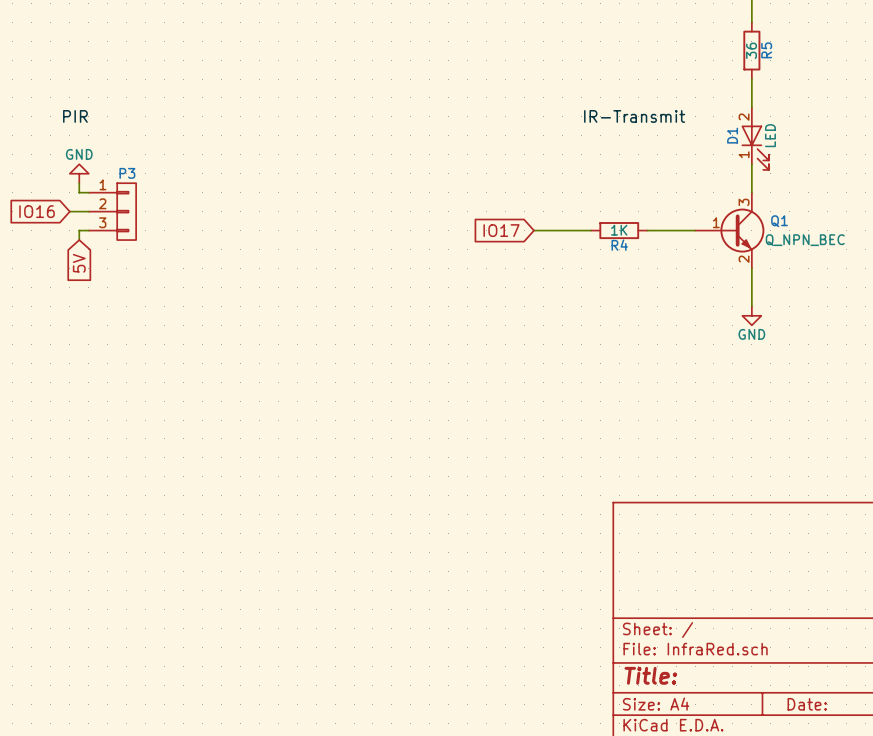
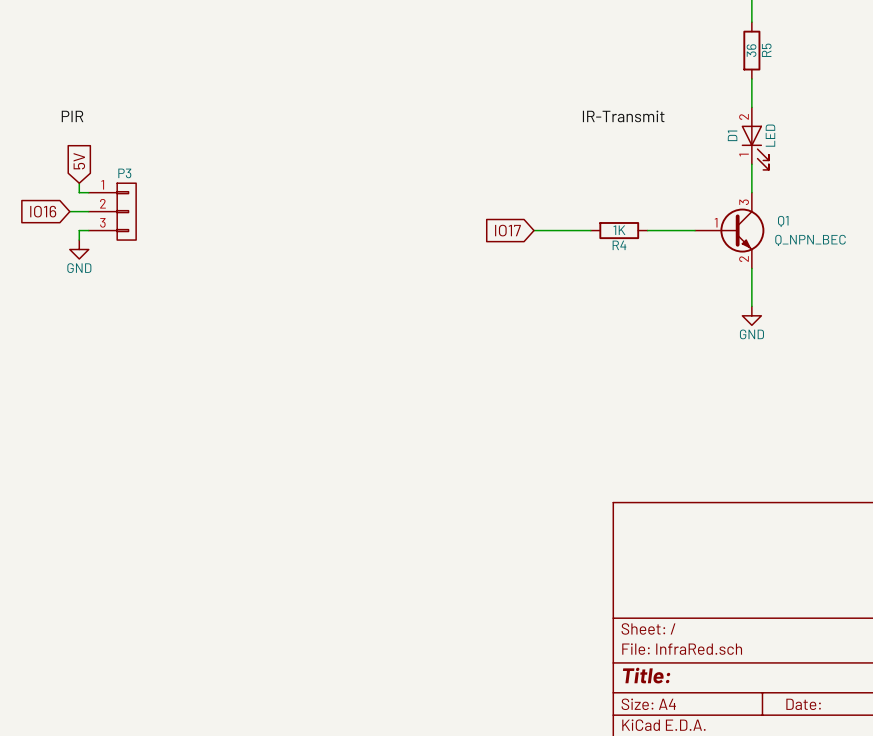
power symbol rotation: 0° (79, 173) -> 180° (79, 249)
power symbol position: GND (79, 173) -> GND (79, 249)
global label rotation: 0° (79, 263) -> 180° (79, 161)
global label position: 5V (79, 263) -> 5V (79, 161)

